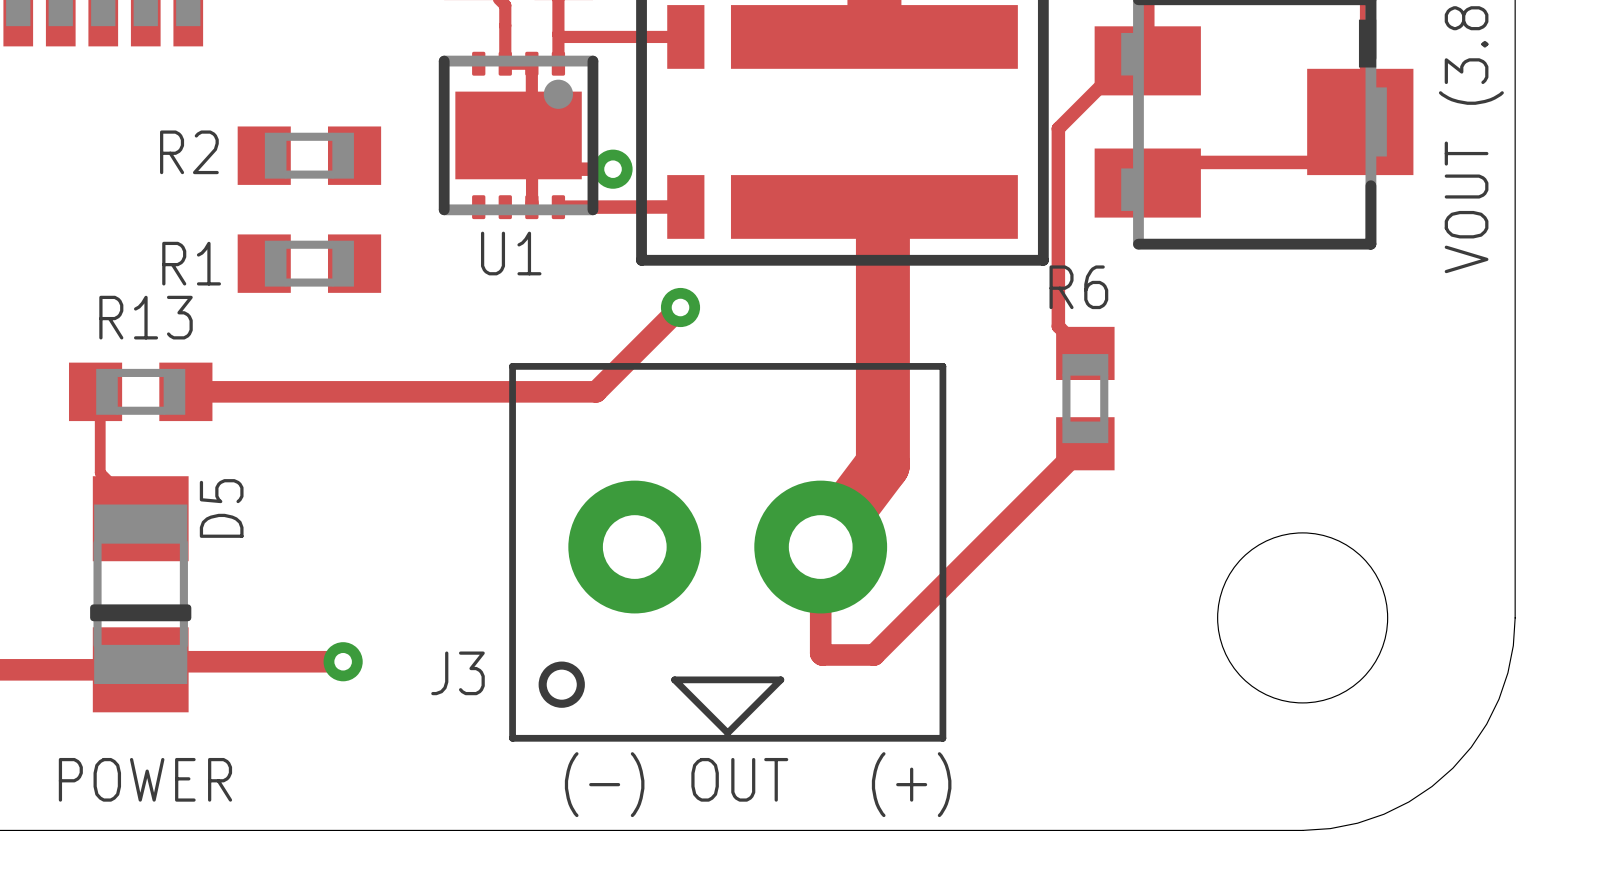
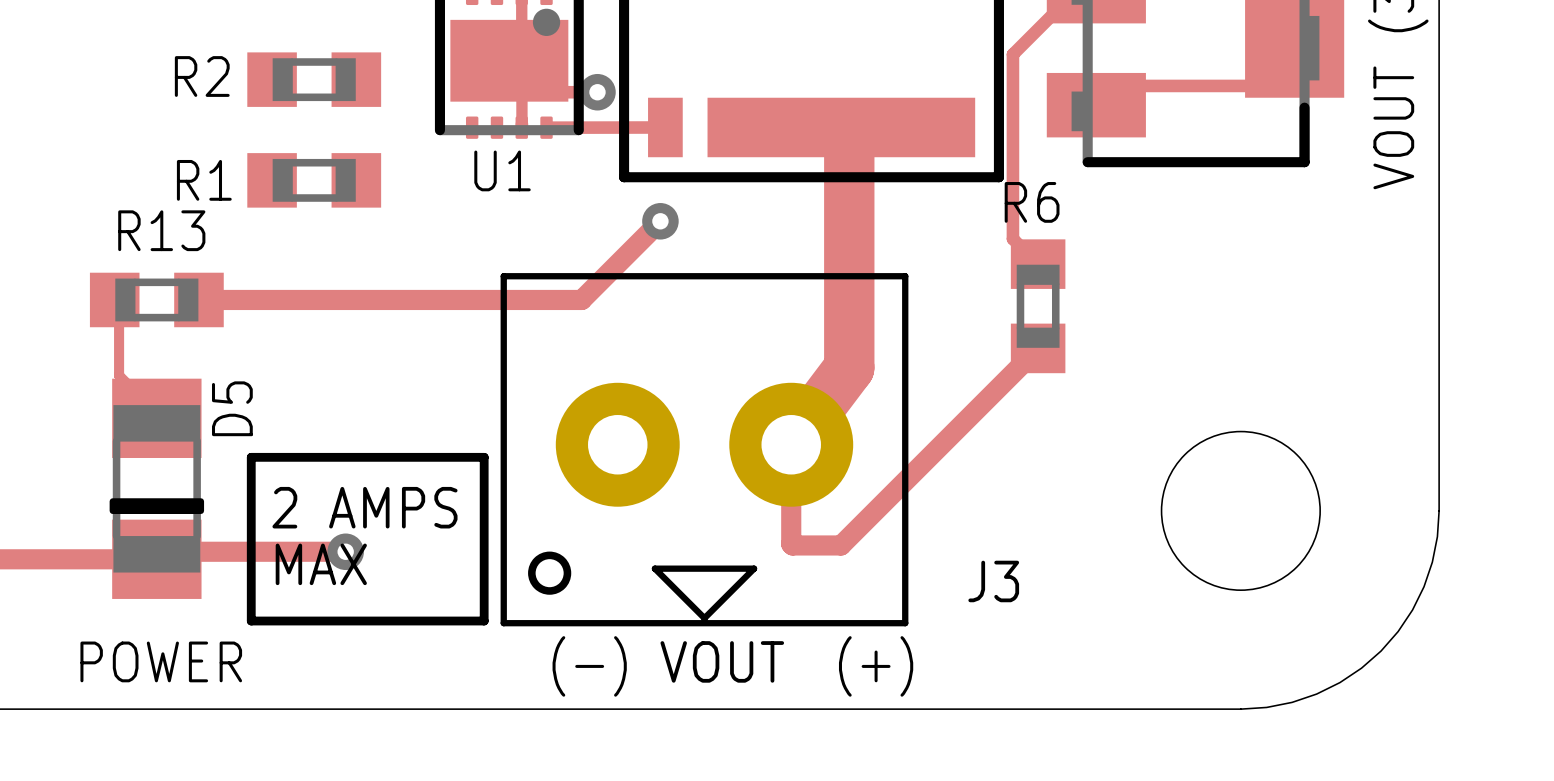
line: none -> (251, 457) (484, 457) (484, 621) (251, 621) (251, 457)
text: none -> 2 AMPS (364, 507)
J3 name position: J3 (458, 673) -> J3 (993, 581)
text: none -> MAX (321, 564)
text: OUT (739, 779) -> VOUT (722, 661)

